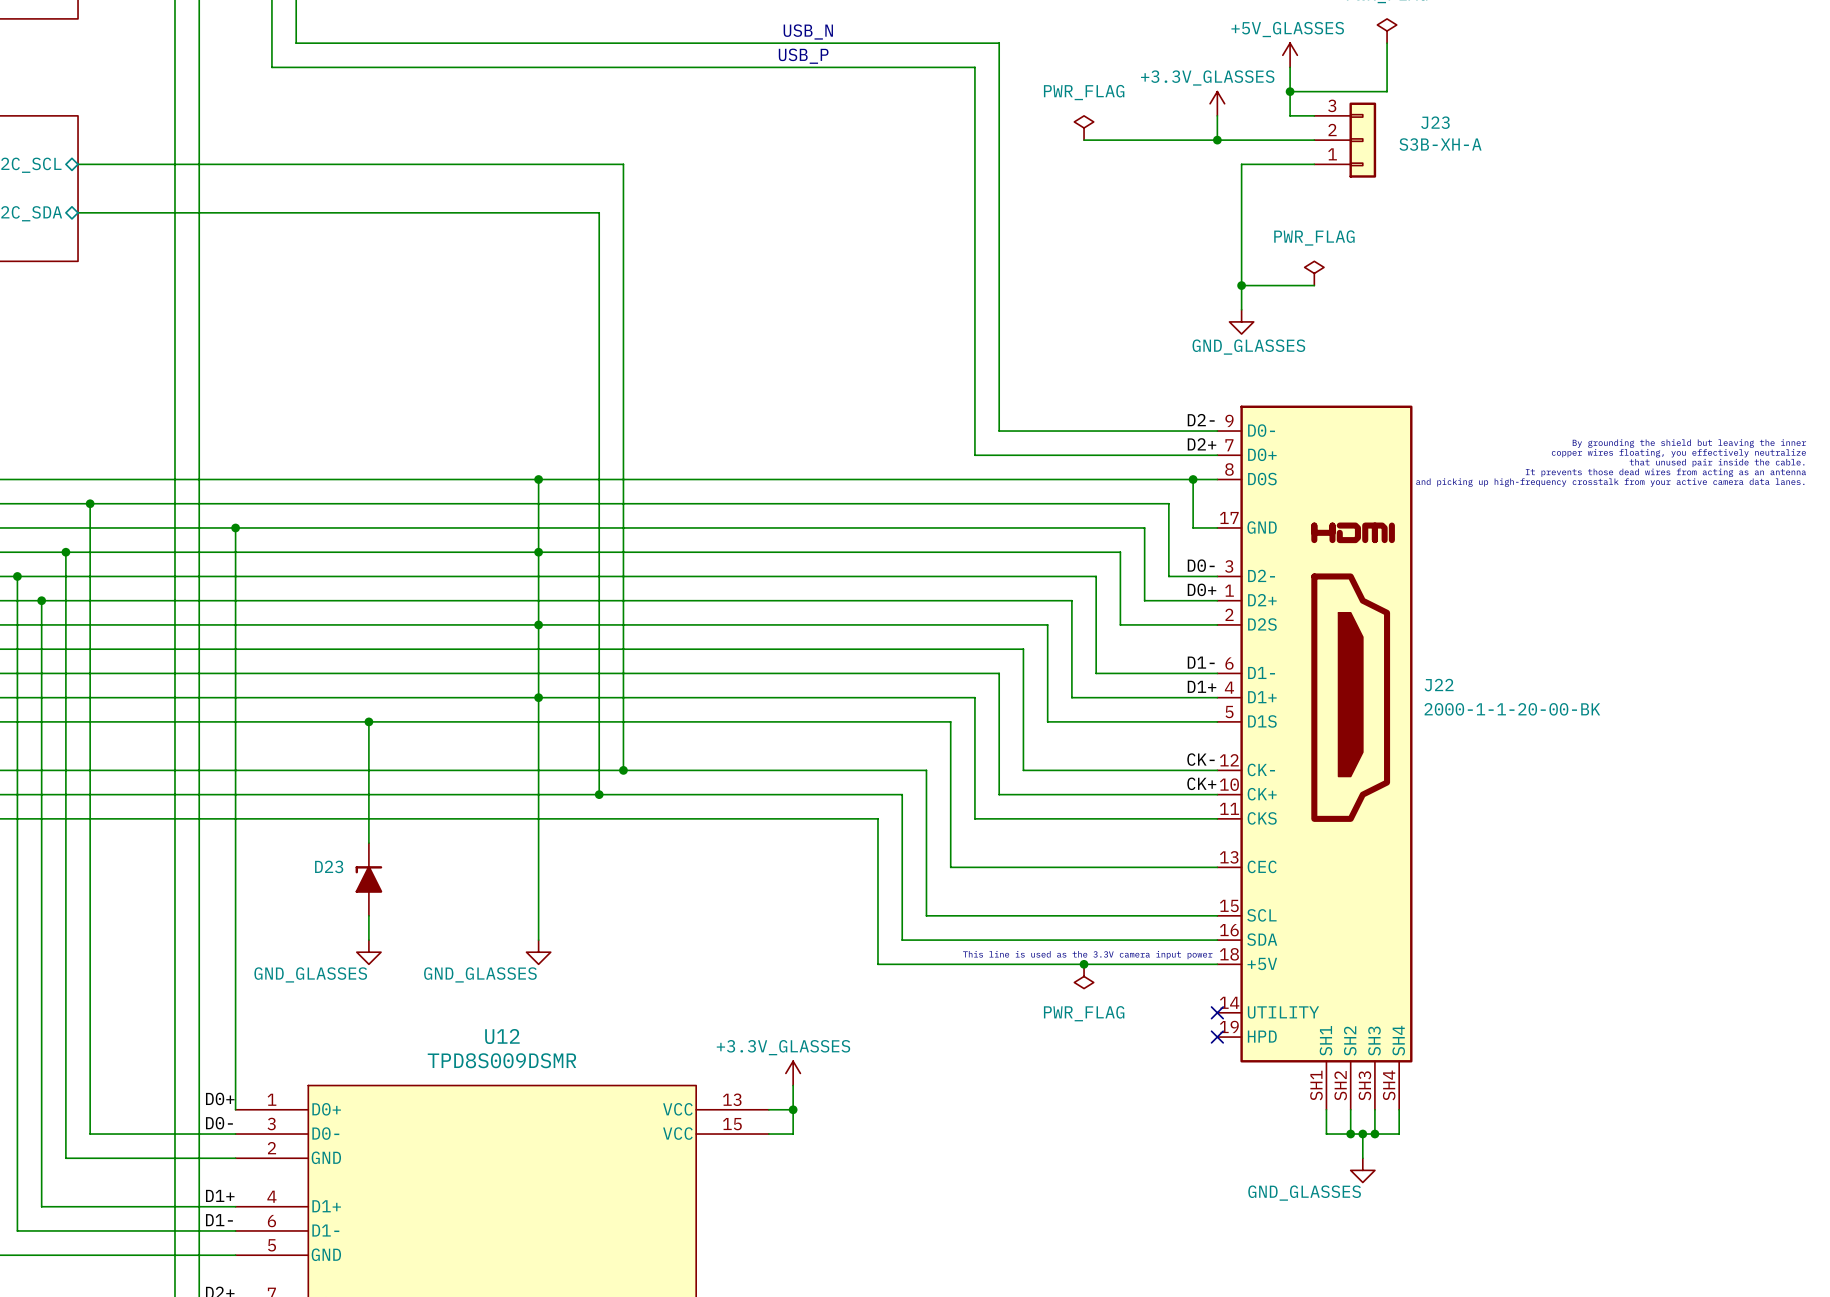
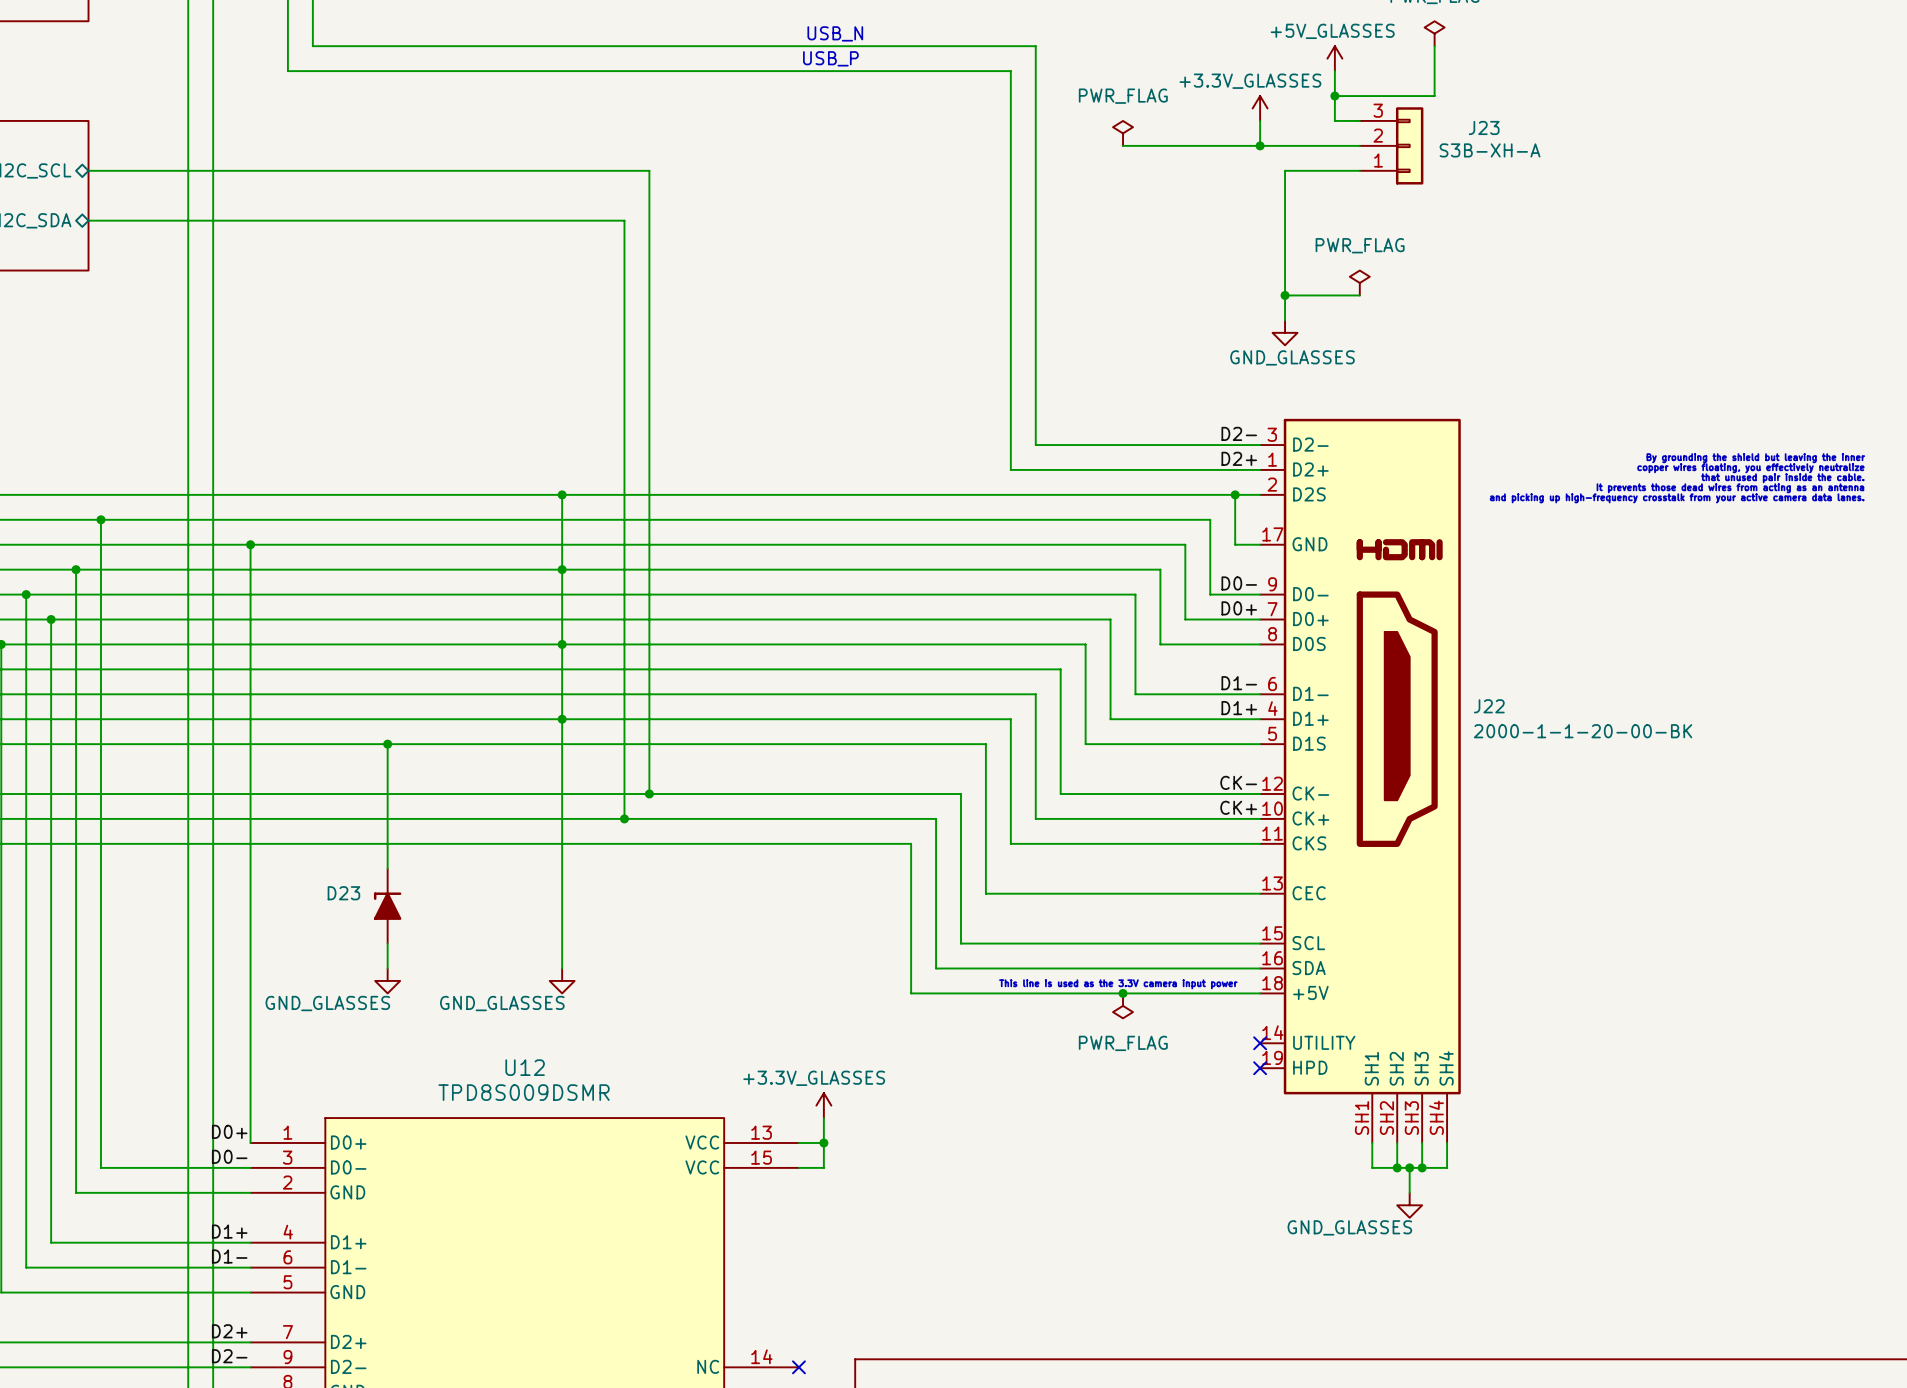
J22 symbol: [1217, 405, 1413, 1110] -> [1260, 418, 1461, 1143]

